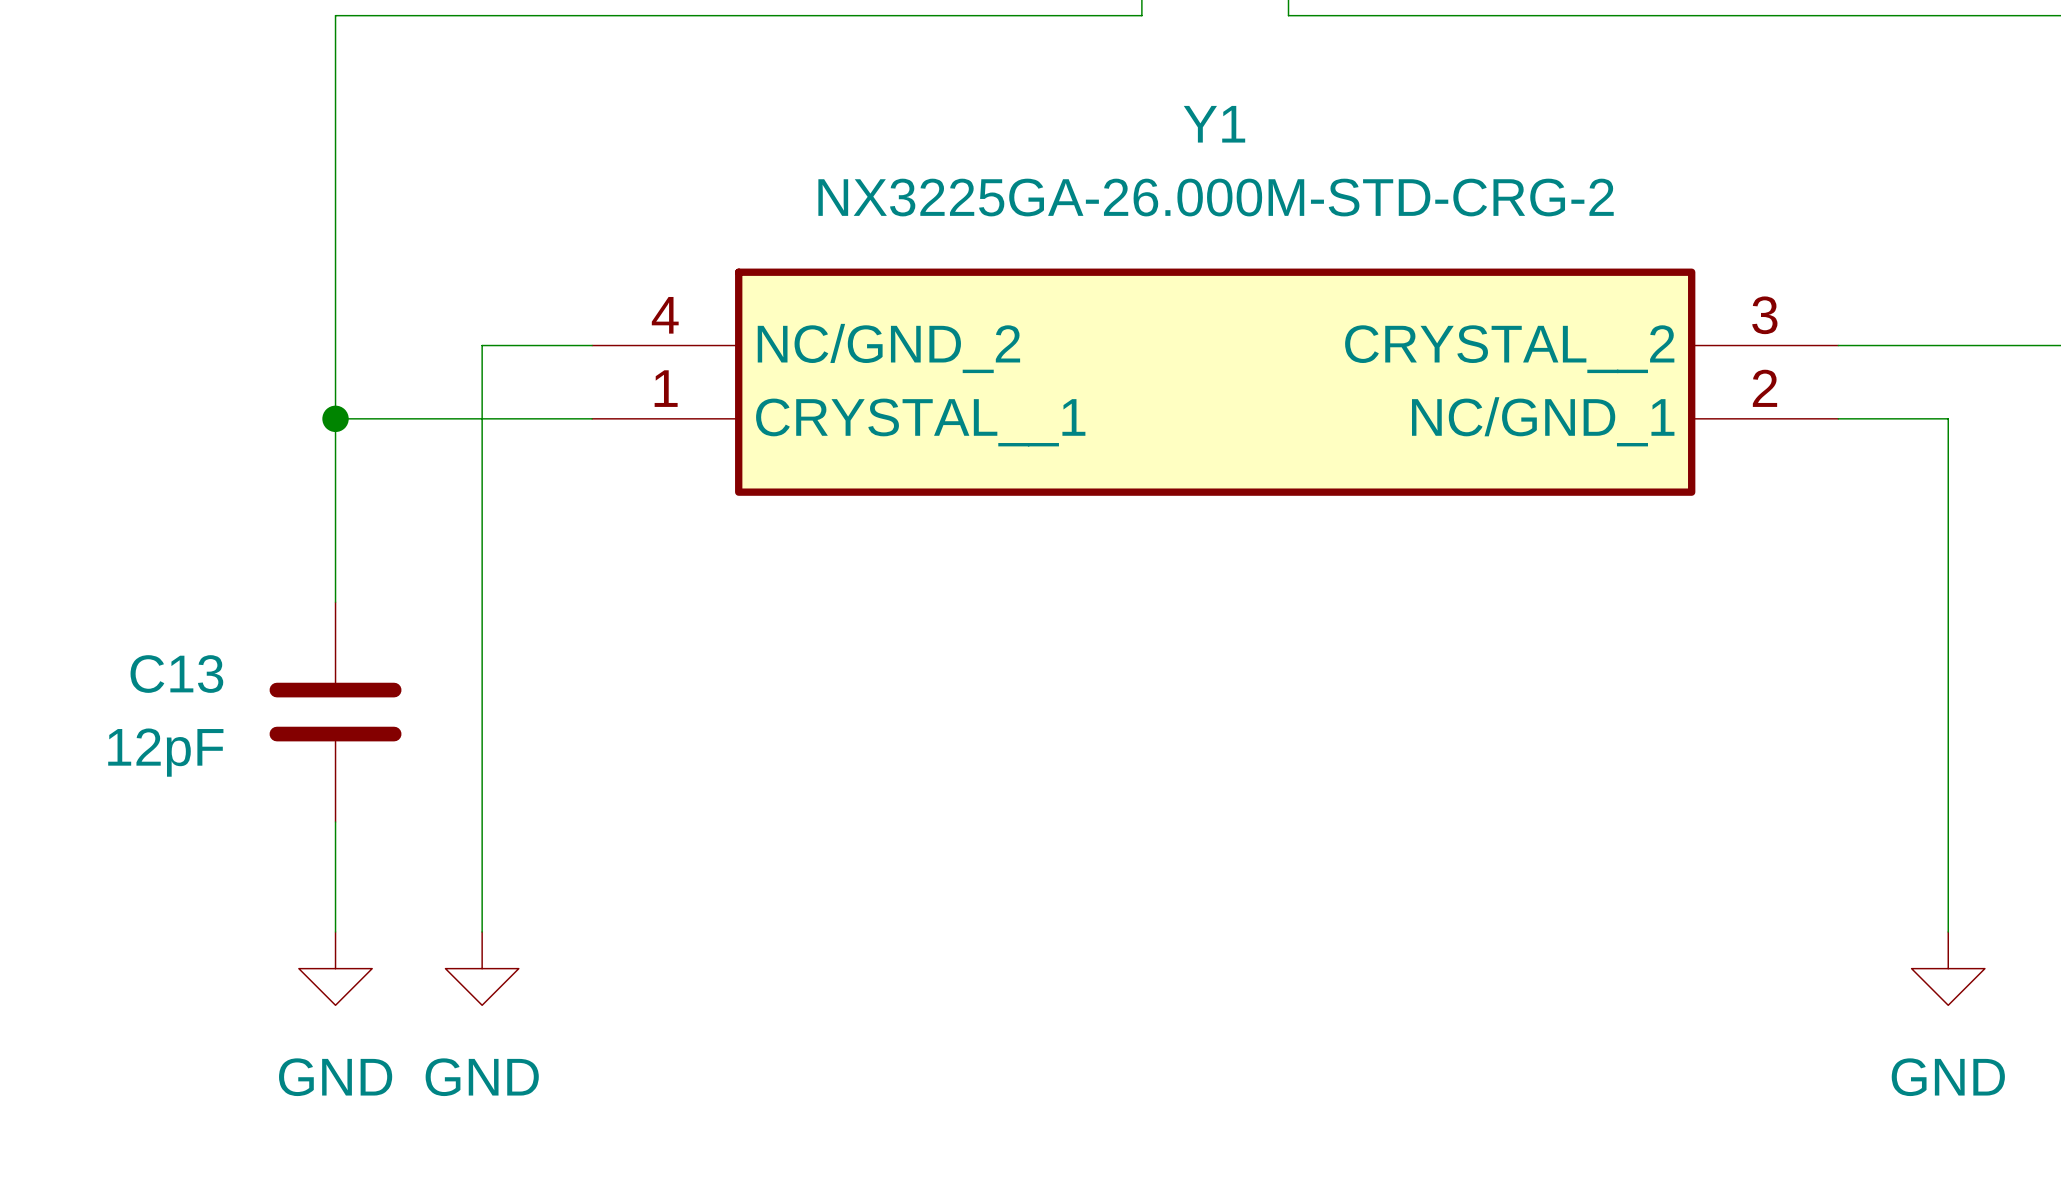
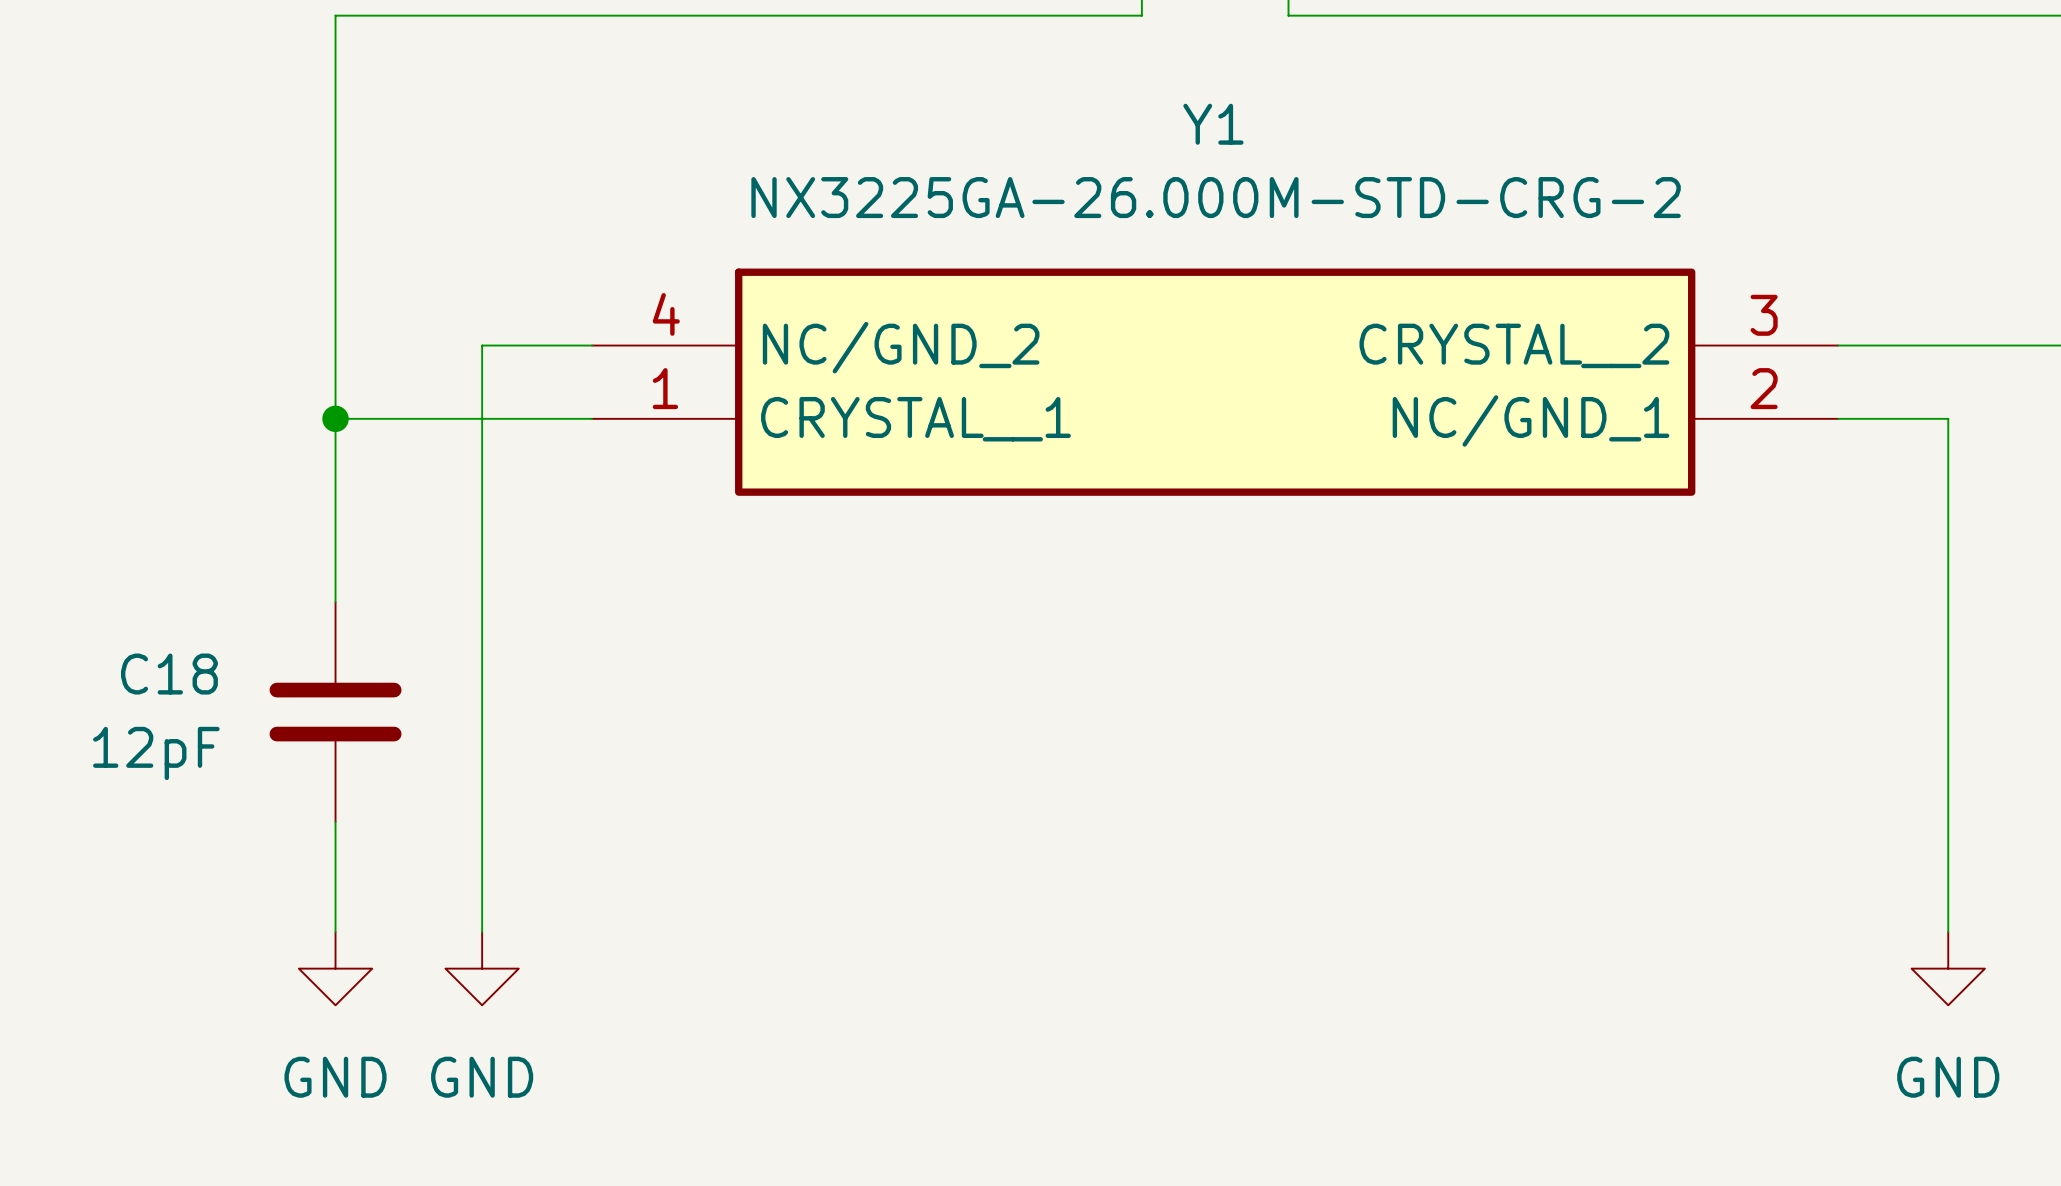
C13 name: C13 (176, 674) -> C18 (169, 674)

